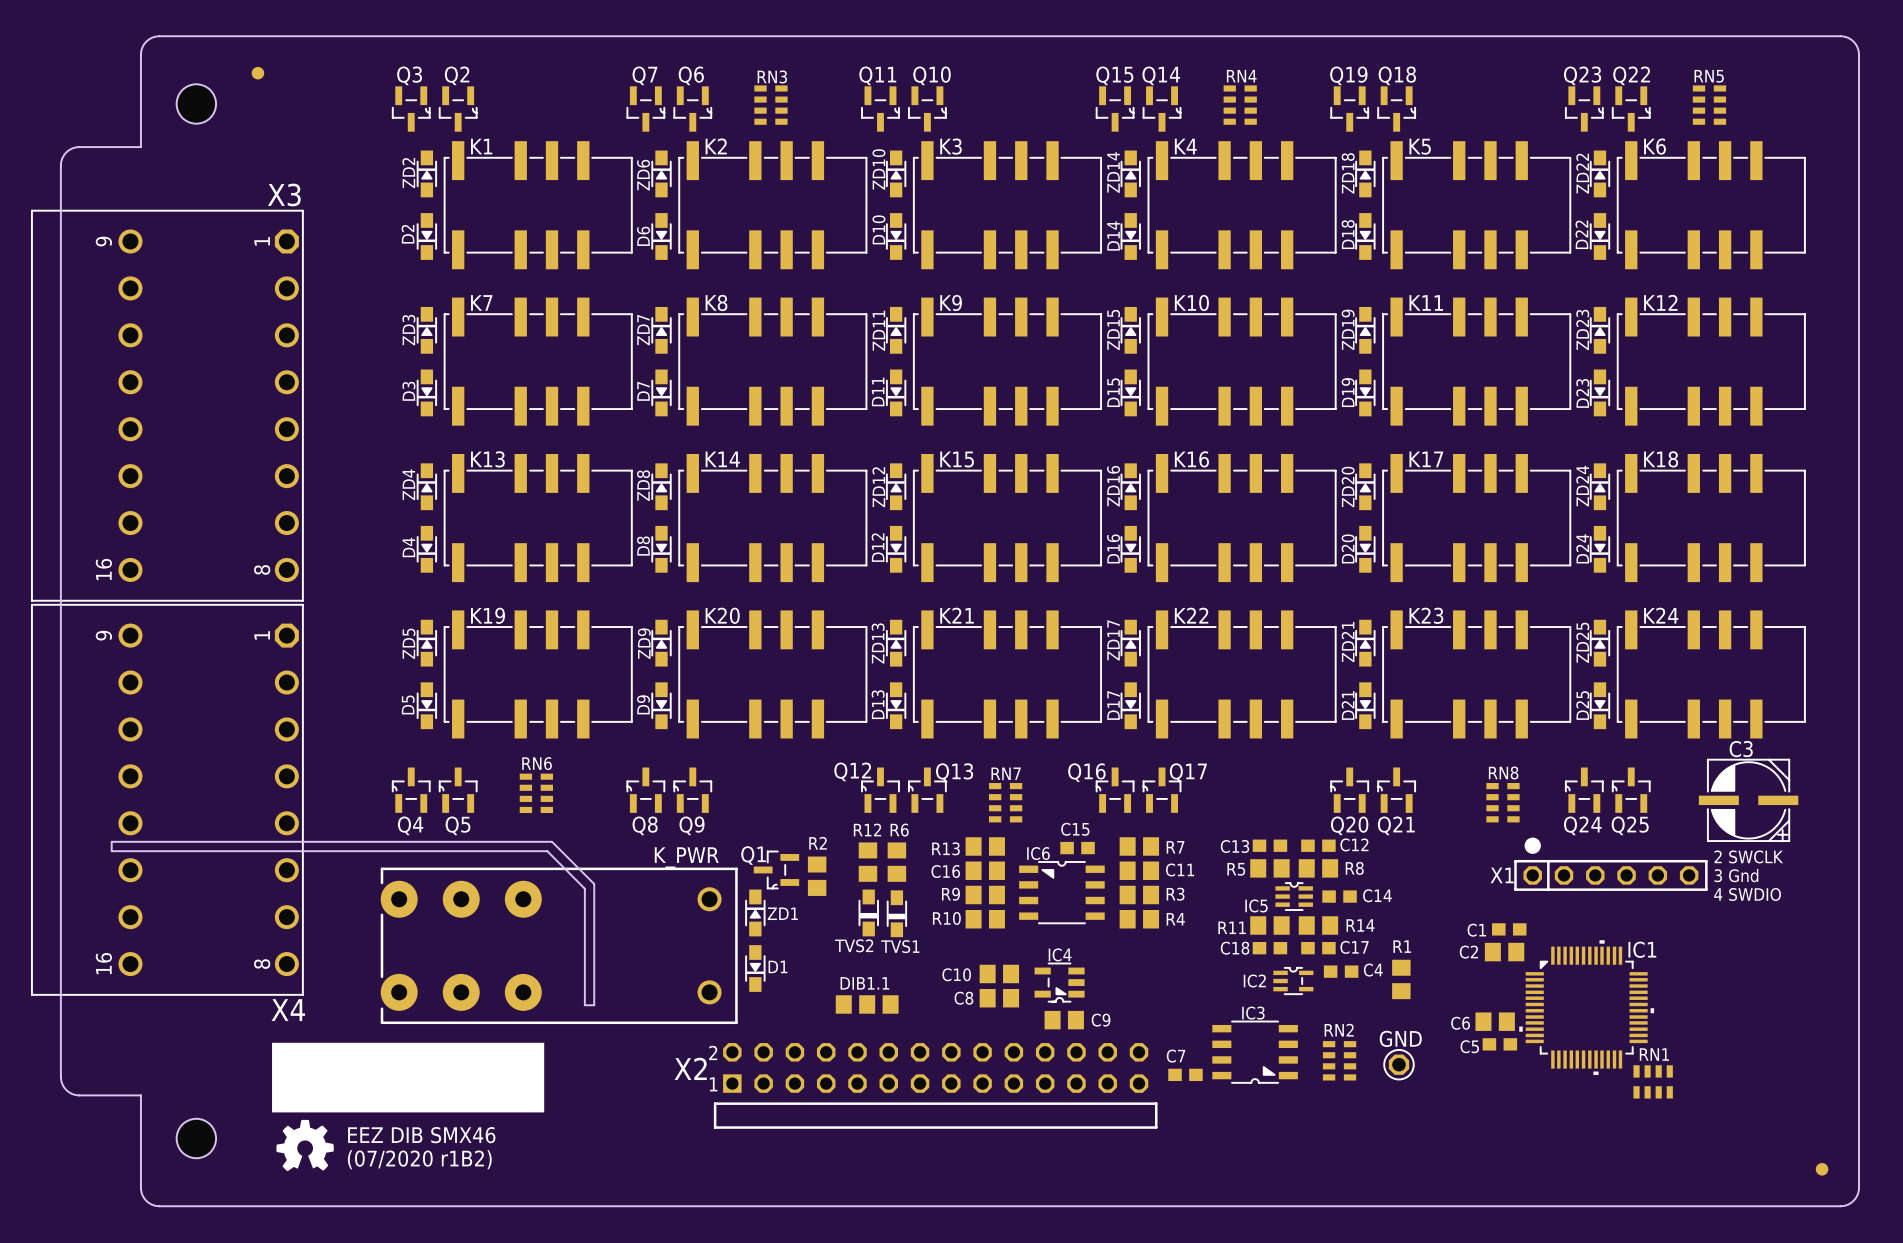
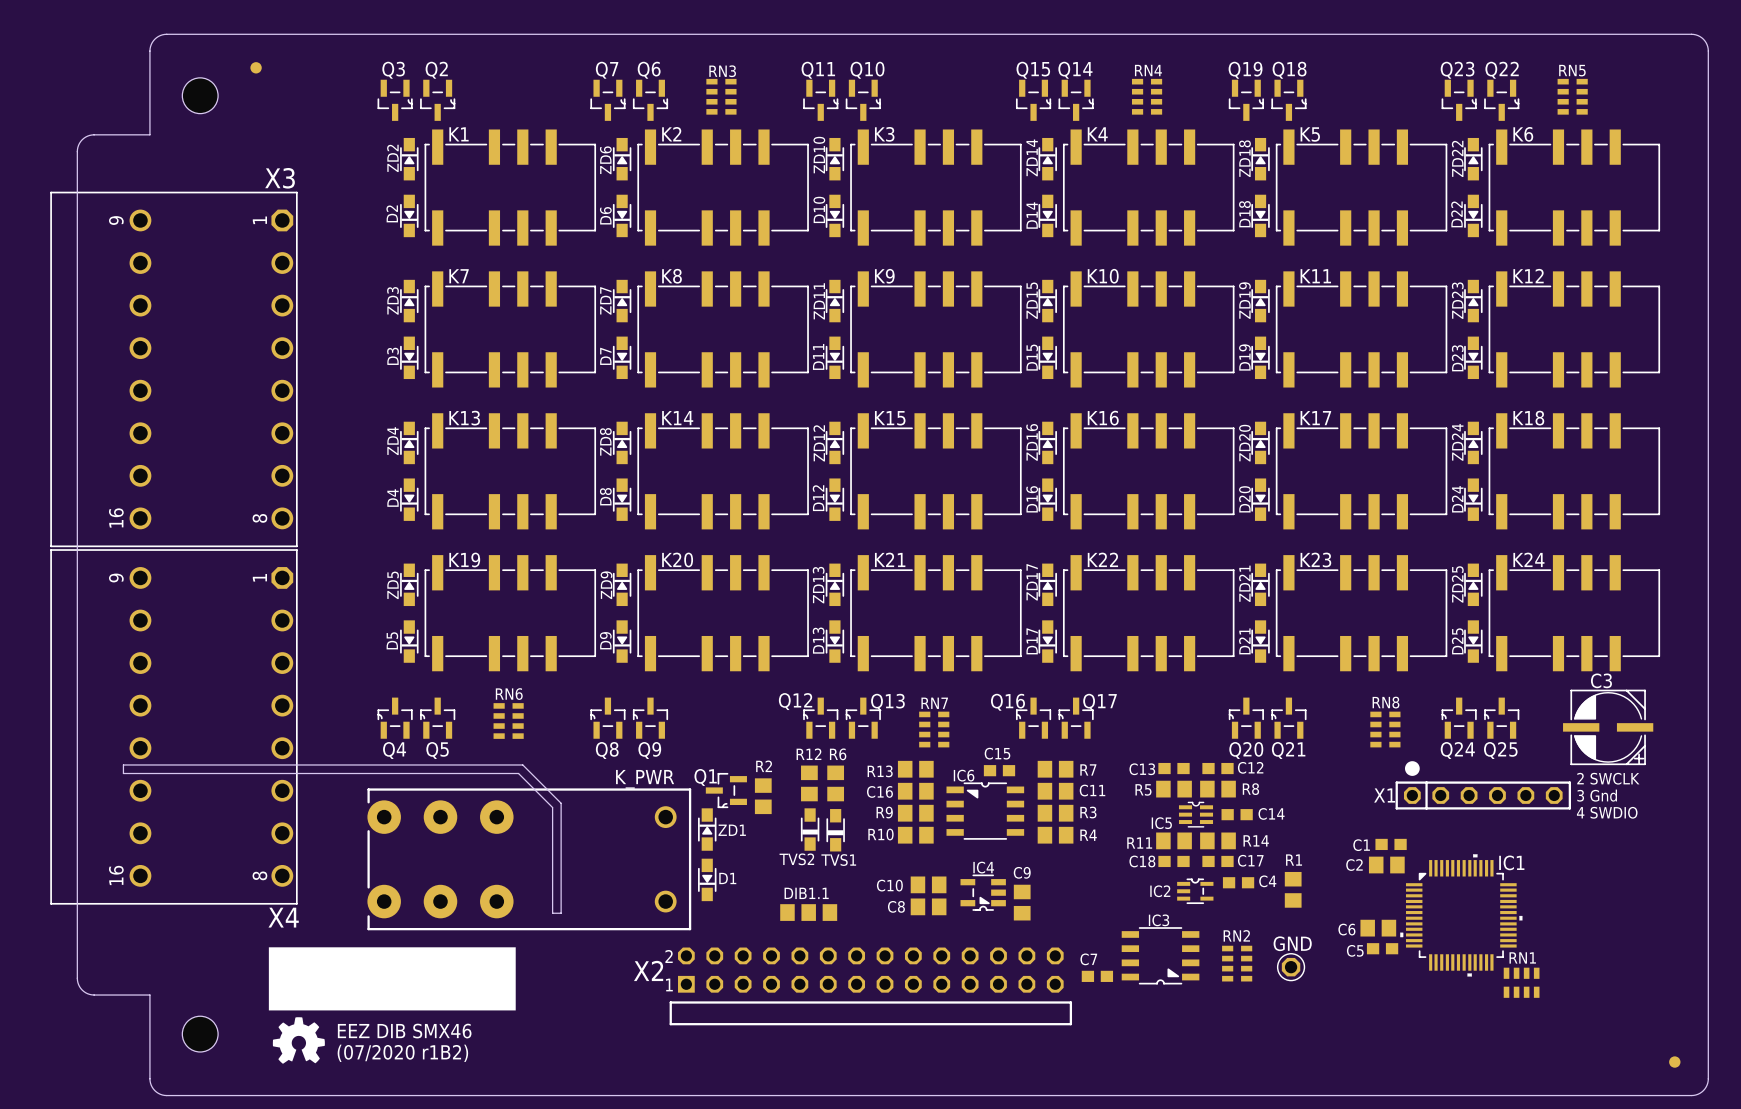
C9 rotation: 0° (1064, 1020) -> 90° clockwise (1022, 902)
C9 position: (1064, 1020) -> (1022, 902)
C9 name position: C9 (1101, 1020) -> C9 (1022, 872)

